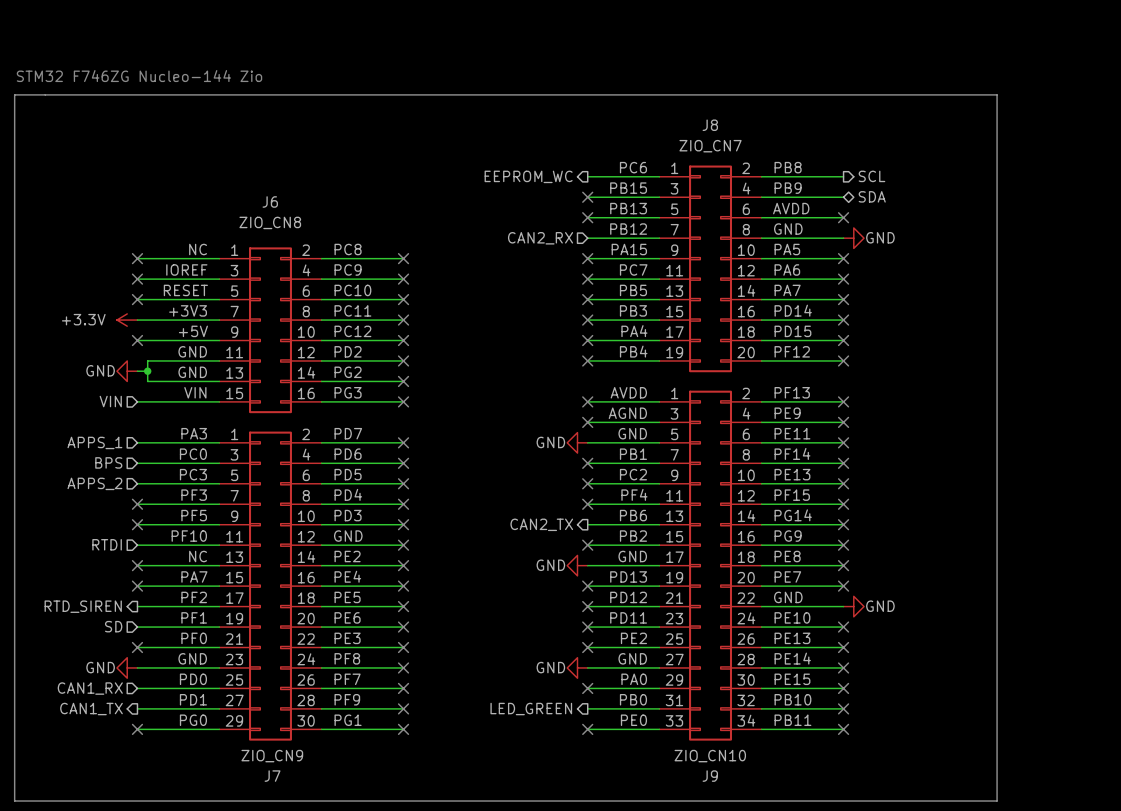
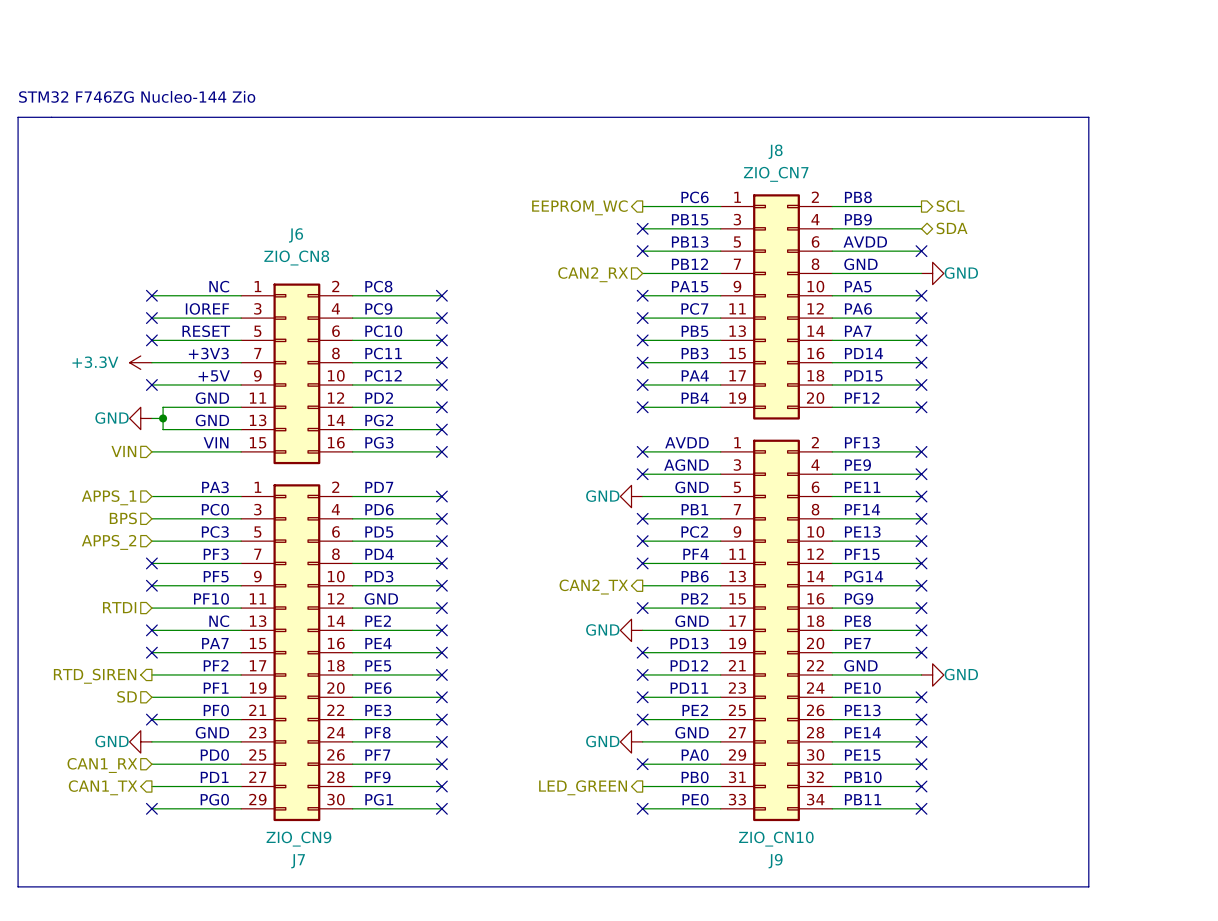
label: PC6 (633, 167) -> none
label: PB8 (788, 167) -> none
text: none -> PC6 (695, 197)
text: none -> PB8 (858, 197)
label: PB15 (628, 188) -> none
text: none -> PB15 (690, 219)
label: PB9 (788, 188) -> none
text: none -> PB9 (858, 219)
label: PB13 (628, 208) -> none
label: AVDD (791, 208) -> none
text: none -> PB13 (690, 242)
text: none -> AVDD (865, 242)
label: PB12 (628, 229) -> none
text: none -> PB12 (689, 264)
label: GND (788, 229) -> none
text: none -> GND (860, 264)
label: NC (198, 249) -> none
label: PC8 (348, 249) -> none
label: PA15 (629, 249) -> none
label: PA5 (787, 249) -> none
text: none -> NC (219, 286)
text: none -> PC8 (378, 286)
text: none -> PA15 (690, 286)
text: none -> PA5 (858, 286)
label: IOREF (186, 269) -> none
label: PC9 (348, 269) -> none
label: PC7 (633, 269) -> none
label: PA6 (787, 269) -> none
text: none -> IOREF (207, 308)
text: none -> PC9 (378, 308)
text: none -> PC7 (694, 308)
text: none -> PA6 (858, 308)
label: RESET (185, 290) -> none
label: PC10 (352, 290) -> none
label: PB5 (633, 290) -> none
label: PA7 (787, 290) -> none
text: none -> RESET (206, 331)
text: none -> PC10 (383, 331)
text: none -> PB5 (694, 331)
text: none -> PA7 (858, 331)
label: +3V3 (188, 310) -> none
label: PC11 (352, 310) -> none
label: PB3 (633, 310) -> none
label: PD14 (793, 310) -> none
text: none -> +3V3 (208, 353)
text: none -> PC11 (383, 353)
text: none -> PB3 (695, 353)
text: none -> PD14 (863, 353)
label: +5V (193, 331) -> none
label: PC12 (352, 331) -> none
label: PA4 (634, 331) -> none
text: none -> PA4 (695, 375)
label: PD15 (792, 331) -> none
text: none -> +5V (214, 375)
text: none -> PC12 (383, 375)
text: none -> PD15 (863, 375)
label: GND (192, 351) -> none
label: PD2 (348, 351) -> none
label: PB4 (633, 351) -> none
label: PF12 (792, 351) -> none
text: none -> GND (212, 398)
text: none -> PD2 (379, 398)
text: none -> PB4 (695, 398)
text: none -> PF12 (862, 398)
label: GND (192, 372) -> none
label: PG2 (348, 372) -> none
text: none -> GND (212, 420)
text: none -> PG2 (379, 420)
label: VIN (195, 392) -> none
label: PG3 (348, 392) -> none
label: AVDD (628, 392) -> none
label: PF13 (792, 392) -> none
text: none -> VIN (216, 442)
text: none -> PG3 (379, 442)
text: none -> AVDD (686, 442)
text: none -> PF13 (862, 442)
label: AGND (627, 413) -> none
text: none -> AGND (686, 465)
label: PE9 (787, 413) -> none
text: none -> PE9 (857, 465)
label: PA3 (194, 433) -> none
label: PD7 (348, 433) -> none
label: GND (632, 433) -> none
label: PE11 (792, 433) -> none
text: none -> PA3 (215, 487)
text: none -> PD7 (379, 487)
text: none -> GND (692, 487)
text: none -> PE11 (862, 487)
label: PF14 (792, 453) -> none
label: PC0 (193, 454) -> none
text: none -> PC0 (215, 509)
label: PD6 (348, 454) -> none
text: none -> PD6 (379, 509)
label: PB1 (633, 454) -> none
text: none -> PB1 (694, 509)
text: none -> PF14 (862, 509)
label: PC3 (193, 474) -> none
label: PD5 (348, 474) -> none
label: PC2 (633, 474) -> none
label: PE13 (792, 474) -> none
text: none -> PC3 (215, 532)
text: none -> PD5 (379, 532)
text: none -> PC2 (694, 532)
text: none -> PE13 (862, 532)
label: PD4 (348, 494) -> none
label: PF4 (634, 494) -> none
label: PF3 (194, 495) -> none
text: none -> PF3 (216, 554)
text: none -> PD4 (379, 554)
text: none -> PF4 (696, 554)
label: PF15 (792, 495) -> none
text: none -> PF15 (862, 554)
label: PF5 (194, 515) -> none
label: PD3 (348, 515) -> none
label: PB6 (633, 515) -> none
label: PG14 (793, 515) -> none
text: none -> PF5 (216, 576)
text: none -> PD3 (379, 576)
text: none -> PB6 (695, 576)
text: none -> PG14 (864, 576)
label: PF10 (189, 536) -> none
text: none -> PF10 (211, 598)
label: GND (348, 536) -> none
text: none -> GND (381, 598)
label: PB2 (633, 536) -> none
text: none -> PB2 (694, 598)
label: PG9 (788, 536) -> none
text: none -> PG9 (859, 598)
label: NC (198, 556) -> none
label: PE2 (347, 556) -> none
label: GND (632, 556) -> none
label: PE8 (787, 556) -> none
text: none -> NC (219, 621)
text: none -> PE2 (378, 621)
text: none -> GND (692, 621)
text: none -> PE8 (857, 621)
label: PA7 (194, 576) -> none
label: PE4 (347, 576) -> none
label: PD13 (628, 576) -> none
label: PE7 (787, 576) -> none
text: none -> PA7 (215, 643)
text: none -> PE4 (378, 643)
text: none -> PD13 (689, 643)
text: none -> PE7 (857, 643)
label: PF2 (194, 597) -> none
label: PE5 (347, 597) -> none
label: PD12 (628, 597) -> none
label: GND (788, 597) -> none
text: none -> PF2 (216, 665)
text: none -> PE5 (378, 665)
text: none -> PD12 (689, 665)
text: none -> GND (860, 665)
label: PF1 (194, 617) -> none
label: PE6 (347, 617) -> none
label: PD11 (628, 617) -> none
label: PE10 (792, 617) -> none
text: none -> PF1 (216, 688)
text: none -> PE6 (378, 688)
text: none -> PD11 (689, 688)
text: none -> PE10 (862, 688)
label: PF0 (194, 638) -> none
label: PE3 (347, 638) -> none
label: PE2 (633, 638) -> none
label: PE13 (792, 638) -> none
text: none -> PF0 (216, 710)
text: none -> PE3 (378, 710)
text: none -> PE2 (695, 710)
text: none -> PE13 (862, 710)
label: GND (192, 658) -> none
label: PF8 (347, 658) -> none
label: GND (632, 658) -> none
label: PE14 (792, 658) -> none
text: none -> GND (212, 732)
text: none -> PF8 (377, 732)
text: none -> GND (692, 732)
text: none -> PE14 (862, 732)
label: PD0 (193, 679) -> none
label: PF7 (347, 679) -> none
label: PA0 (634, 679) -> none
label: PE15 (792, 679) -> none
text: none -> PD0 (214, 755)
text: none -> PF7 (377, 755)
text: none -> PA0 (695, 755)
text: none -> PE15 (862, 755)
label: PD1 (193, 699) -> none
label: PF9 (347, 699) -> none
label: PB0 (633, 699) -> none
label: PB10 (792, 699) -> none
text: none -> PD1 (214, 777)
text: none -> PF9 (377, 777)
text: none -> PB0 (695, 777)
text: none -> PB10 (863, 777)
label: PG0 (193, 720) -> none
text: none -> PG0 (214, 799)
label: PG1 (348, 720) -> none
text: none -> PG1 (379, 799)
label: PE0 (633, 720) -> none
text: none -> PE0 (695, 799)
label: PB11 (792, 720) -> none
text: none -> PB11 (863, 799)

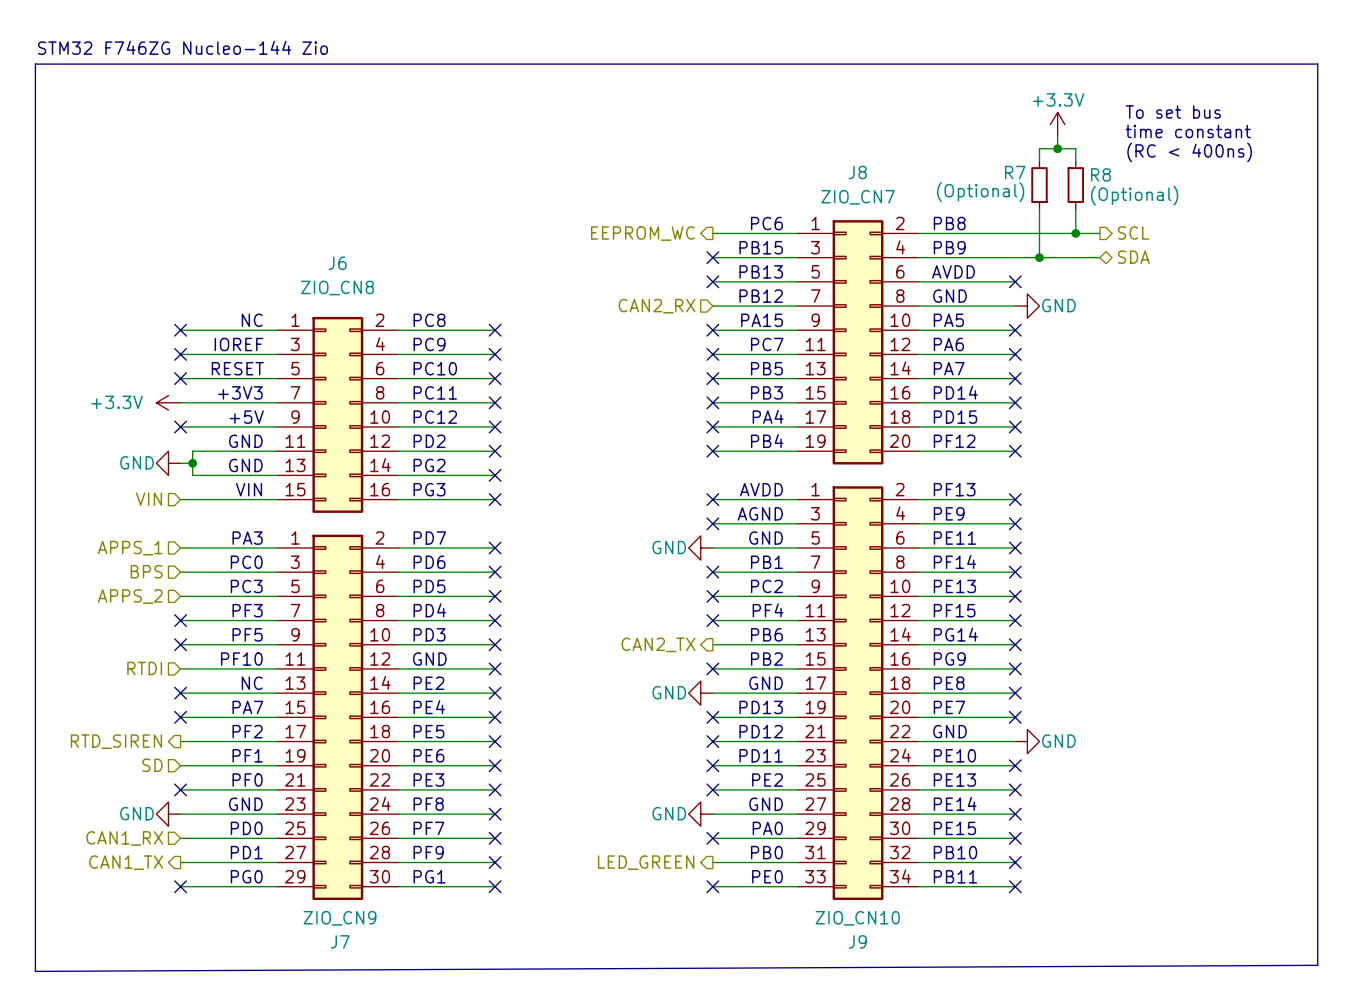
text: none -> To set bus (1173, 112)
text position: STM32 F746ZG Nucleo-144 Zio (137, 96) -> STM32 F746ZG Nucleo-144 Zio (182, 47)
power symbol: none -> +3.3V (1057, 124)
text: none -> time constant (1188, 131)
line: (18, 117) (1088, 117) (1088, 886) (18, 886) -> (35, 136) (35, 64) (1317, 64) (1317, 965) (35, 971)
wire: none -> (1057, 136) (1057, 148)
junction: none -> (1057, 148)
text: none -> (RC < 400ns) (1189, 152)
wire: none -> (1039, 160) (1039, 148) (1075, 148) (1075, 160)
R7: none -> (Optional) (1039, 185)
R8: none -> (Optional) (1075, 185)
wire: none -> (1039, 209) (1039, 257)
wire: none -> (1075, 209) (1075, 233)
wire: none -> (1015, 233) (1099, 233)
hierarchical label position: SCL (950, 206) -> SCL (1133, 232)
junction: none -> (1075, 233)
wire: none -> (1015, 257) (1099, 257)
junction: none -> (1039, 257)
hierarchical label position: SDA (952, 228) -> SDA (1133, 257)

